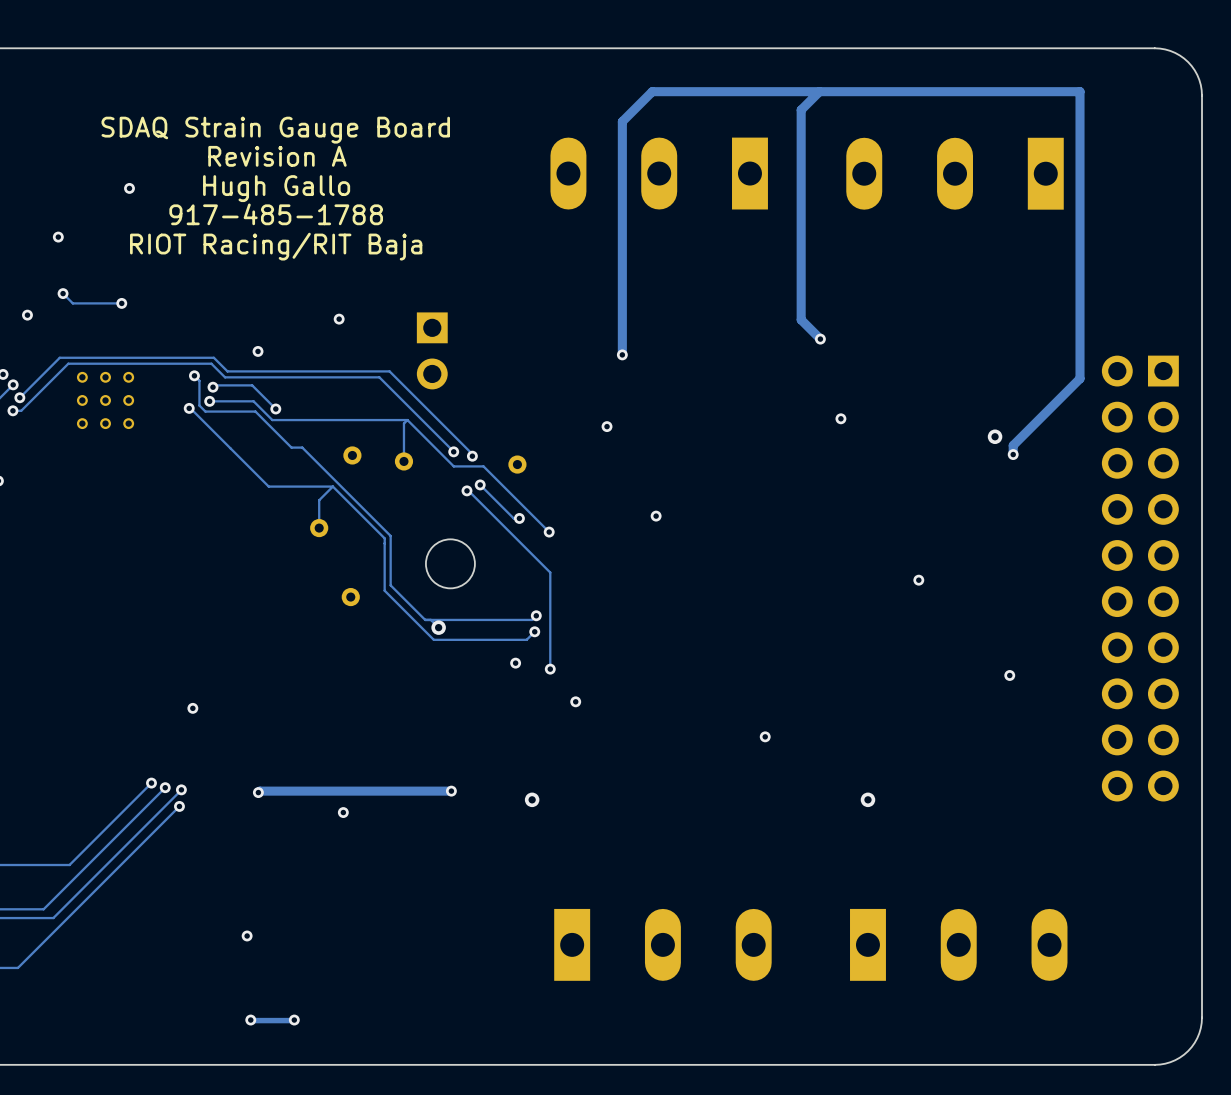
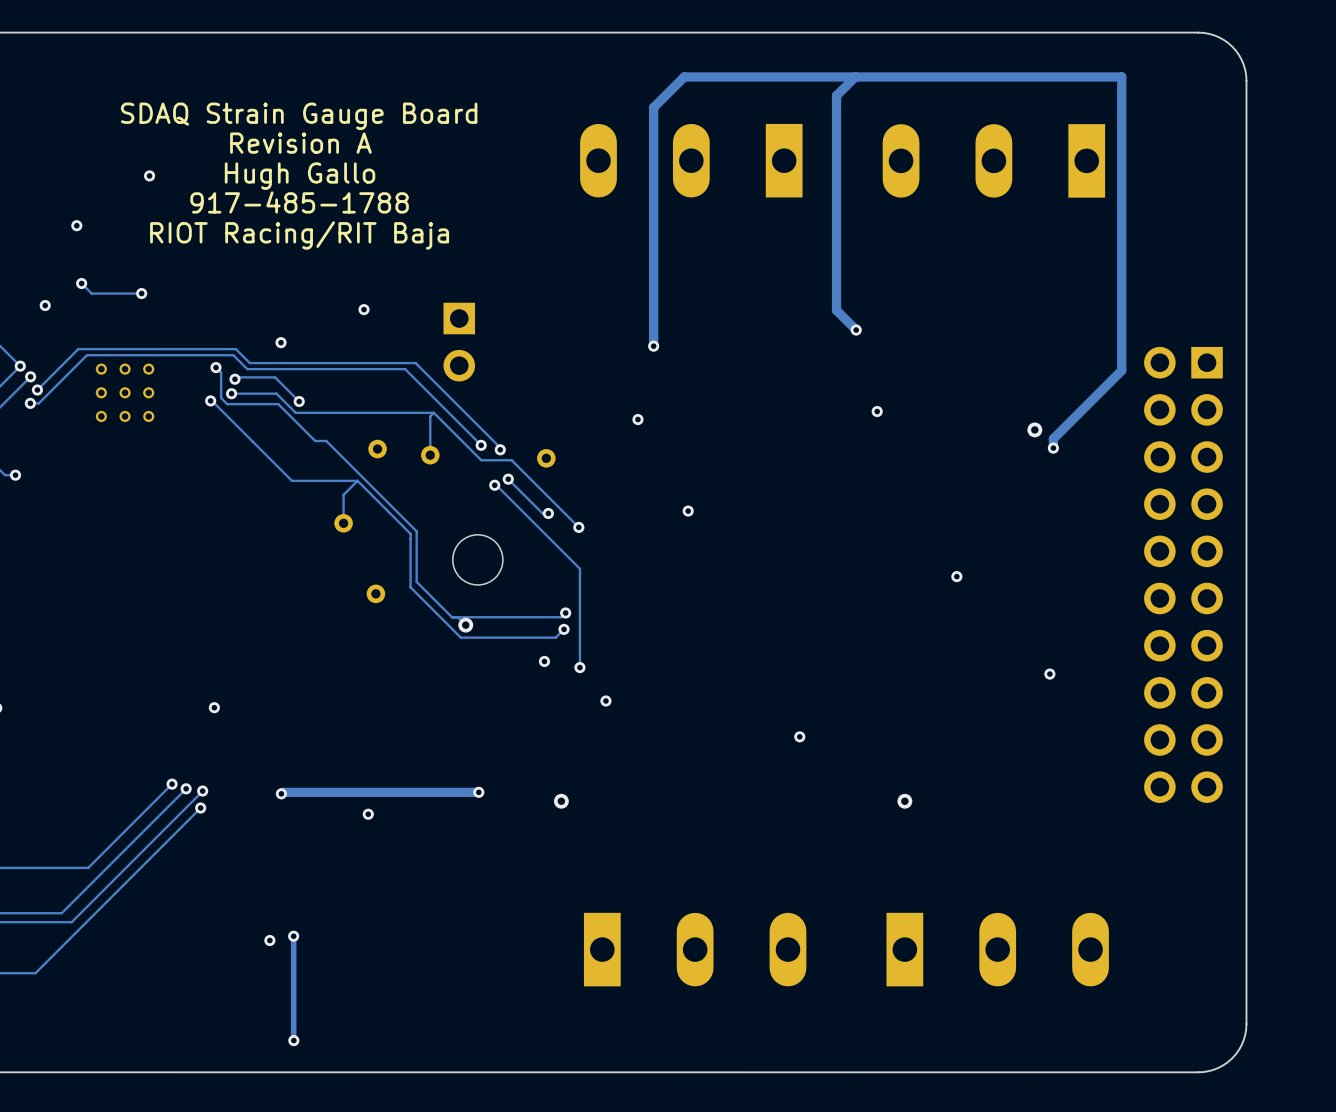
track: none -> (293, 936) (293, 1040)
via: none -> (293, 936)
via: (250, 1020) -> none
track: (294, 1020) (250, 1020) -> none
via: (294, 1020) -> none
via: none -> (293, 1040)

